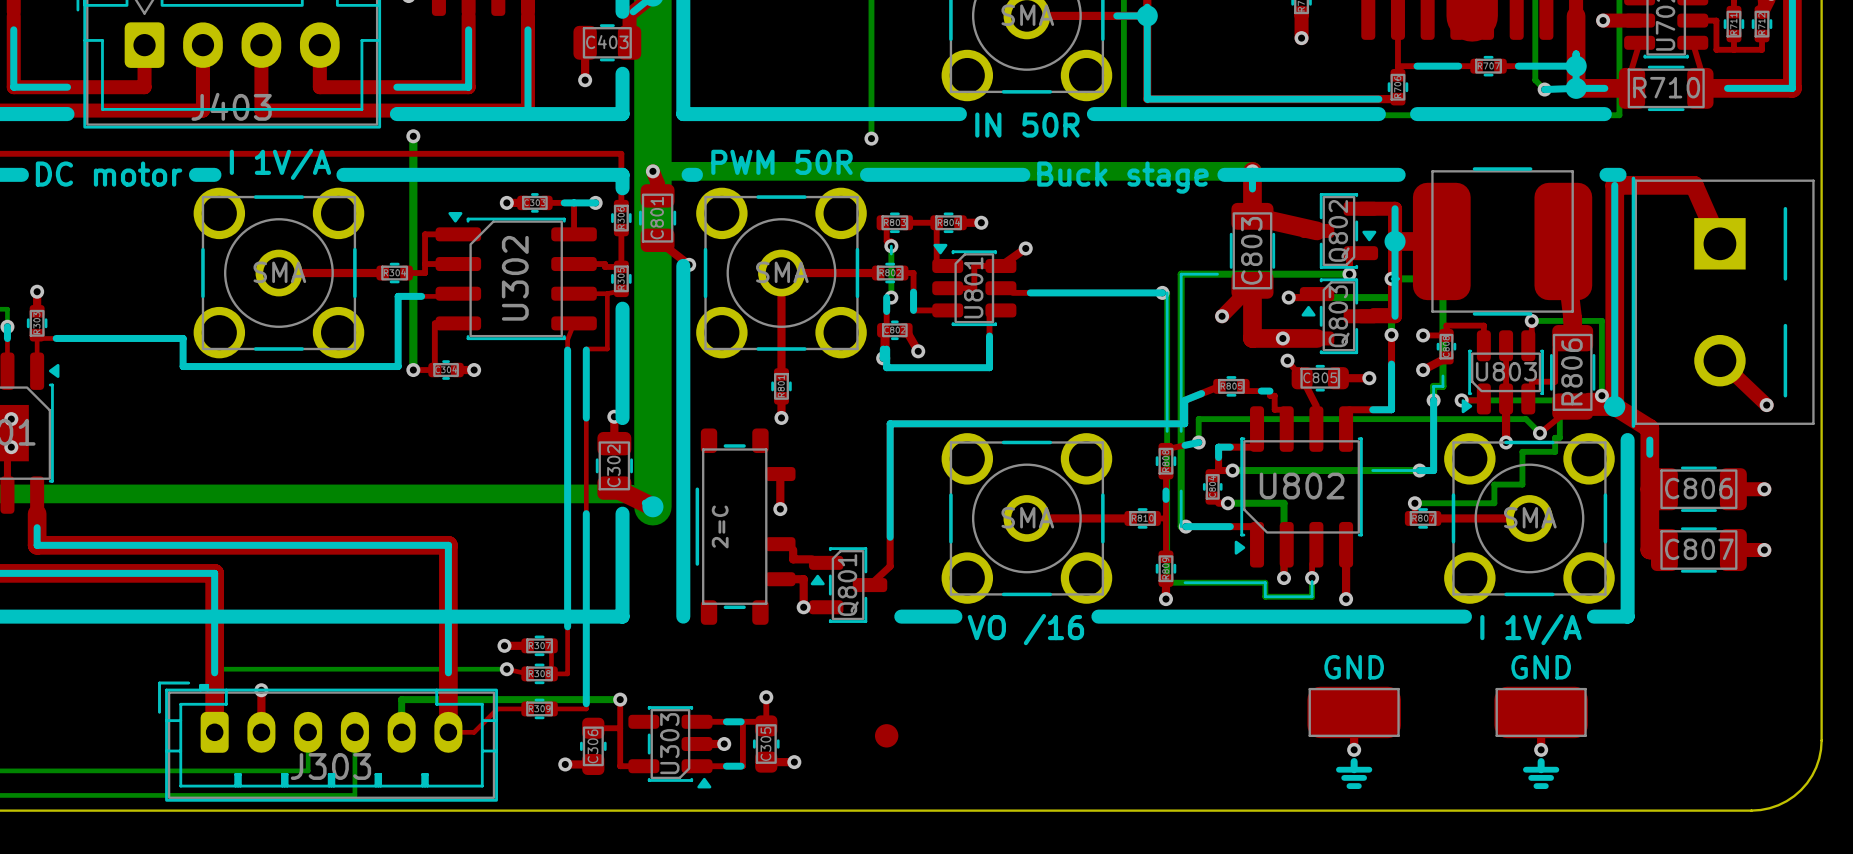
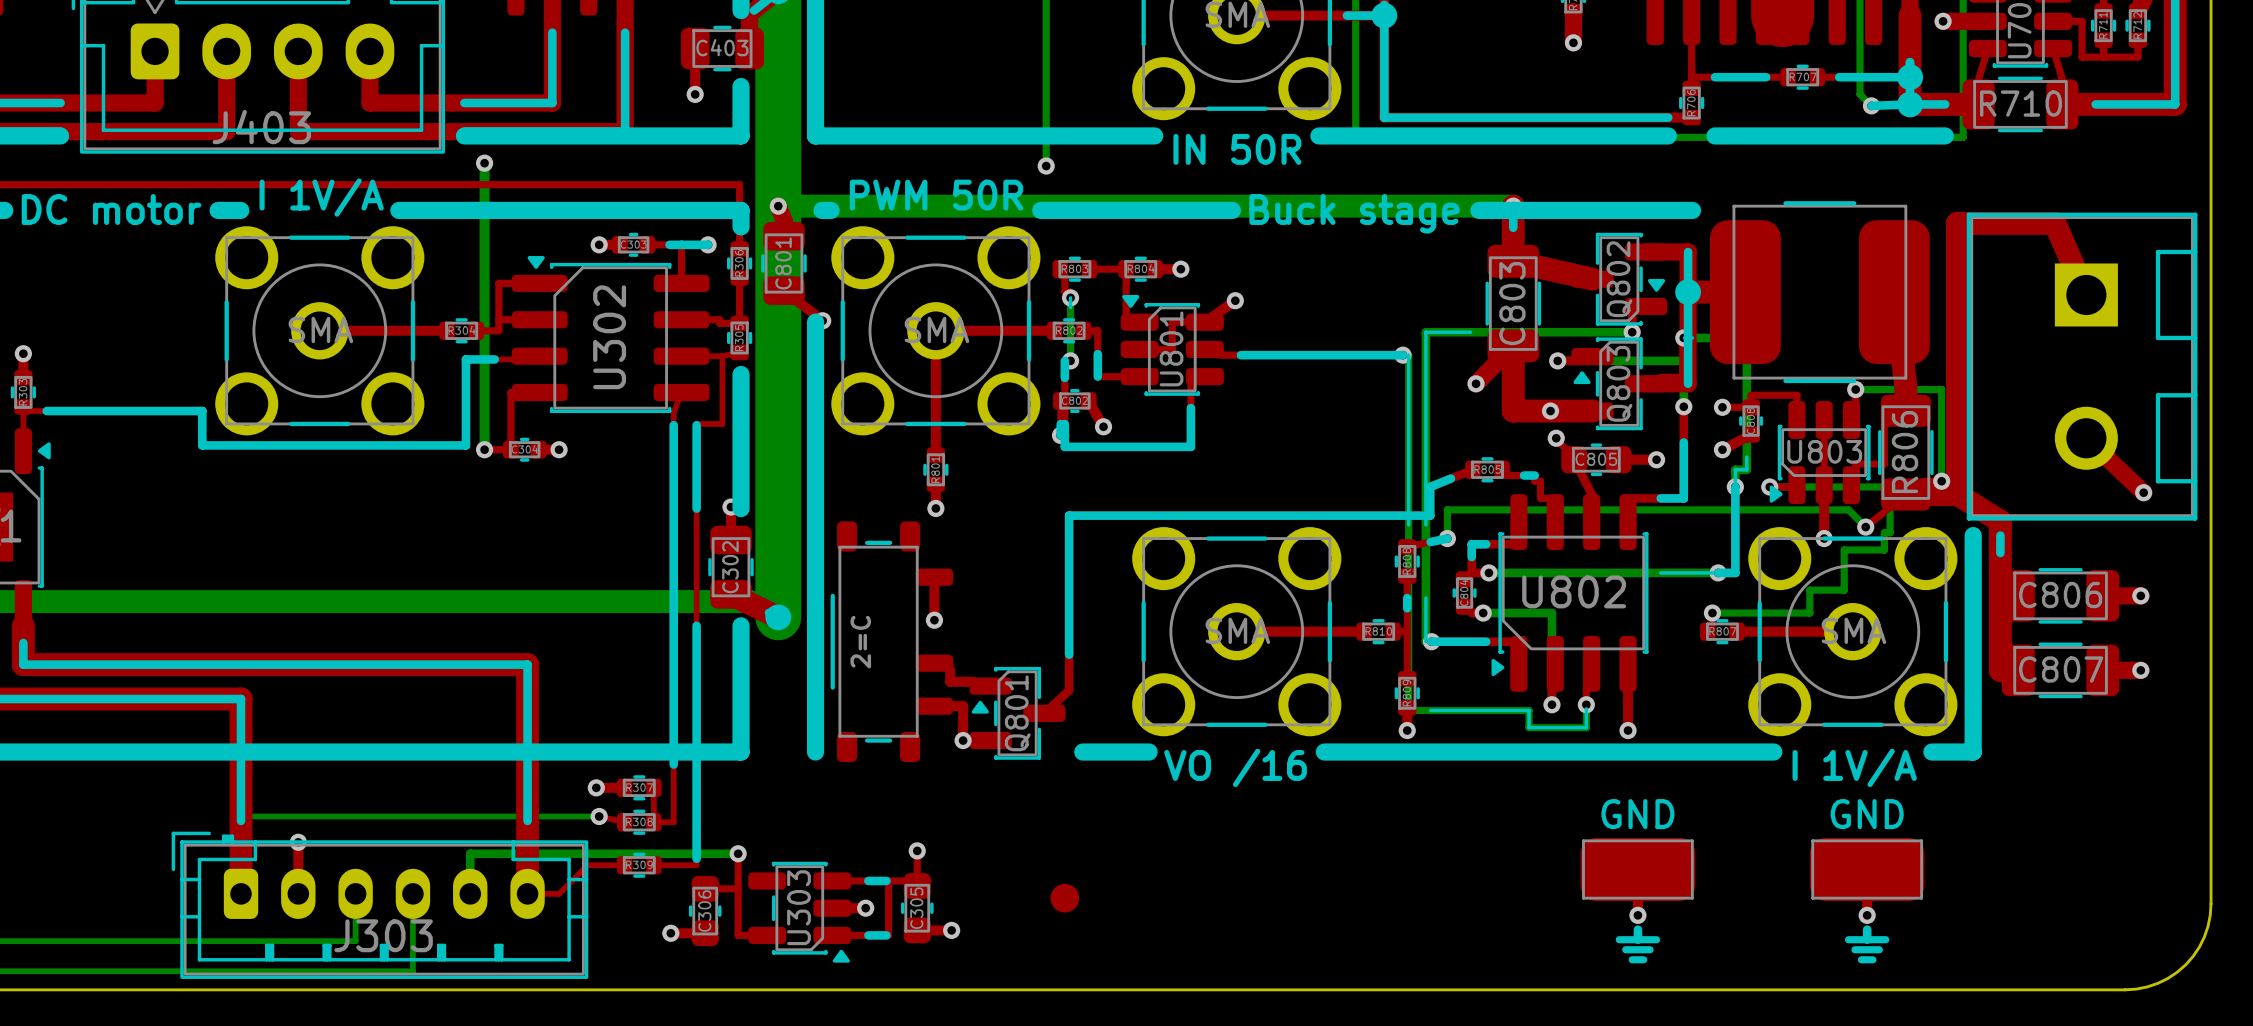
line: (1606, 174) (1619, 174) -> none
part footprint: [1631, 176, 1815, 428] -> [1966, 212, 2198, 521]
line: (1614, 185) (1614, 406) (1607, 406) -> none
drawing: [1604, 395, 1626, 418] -> none

